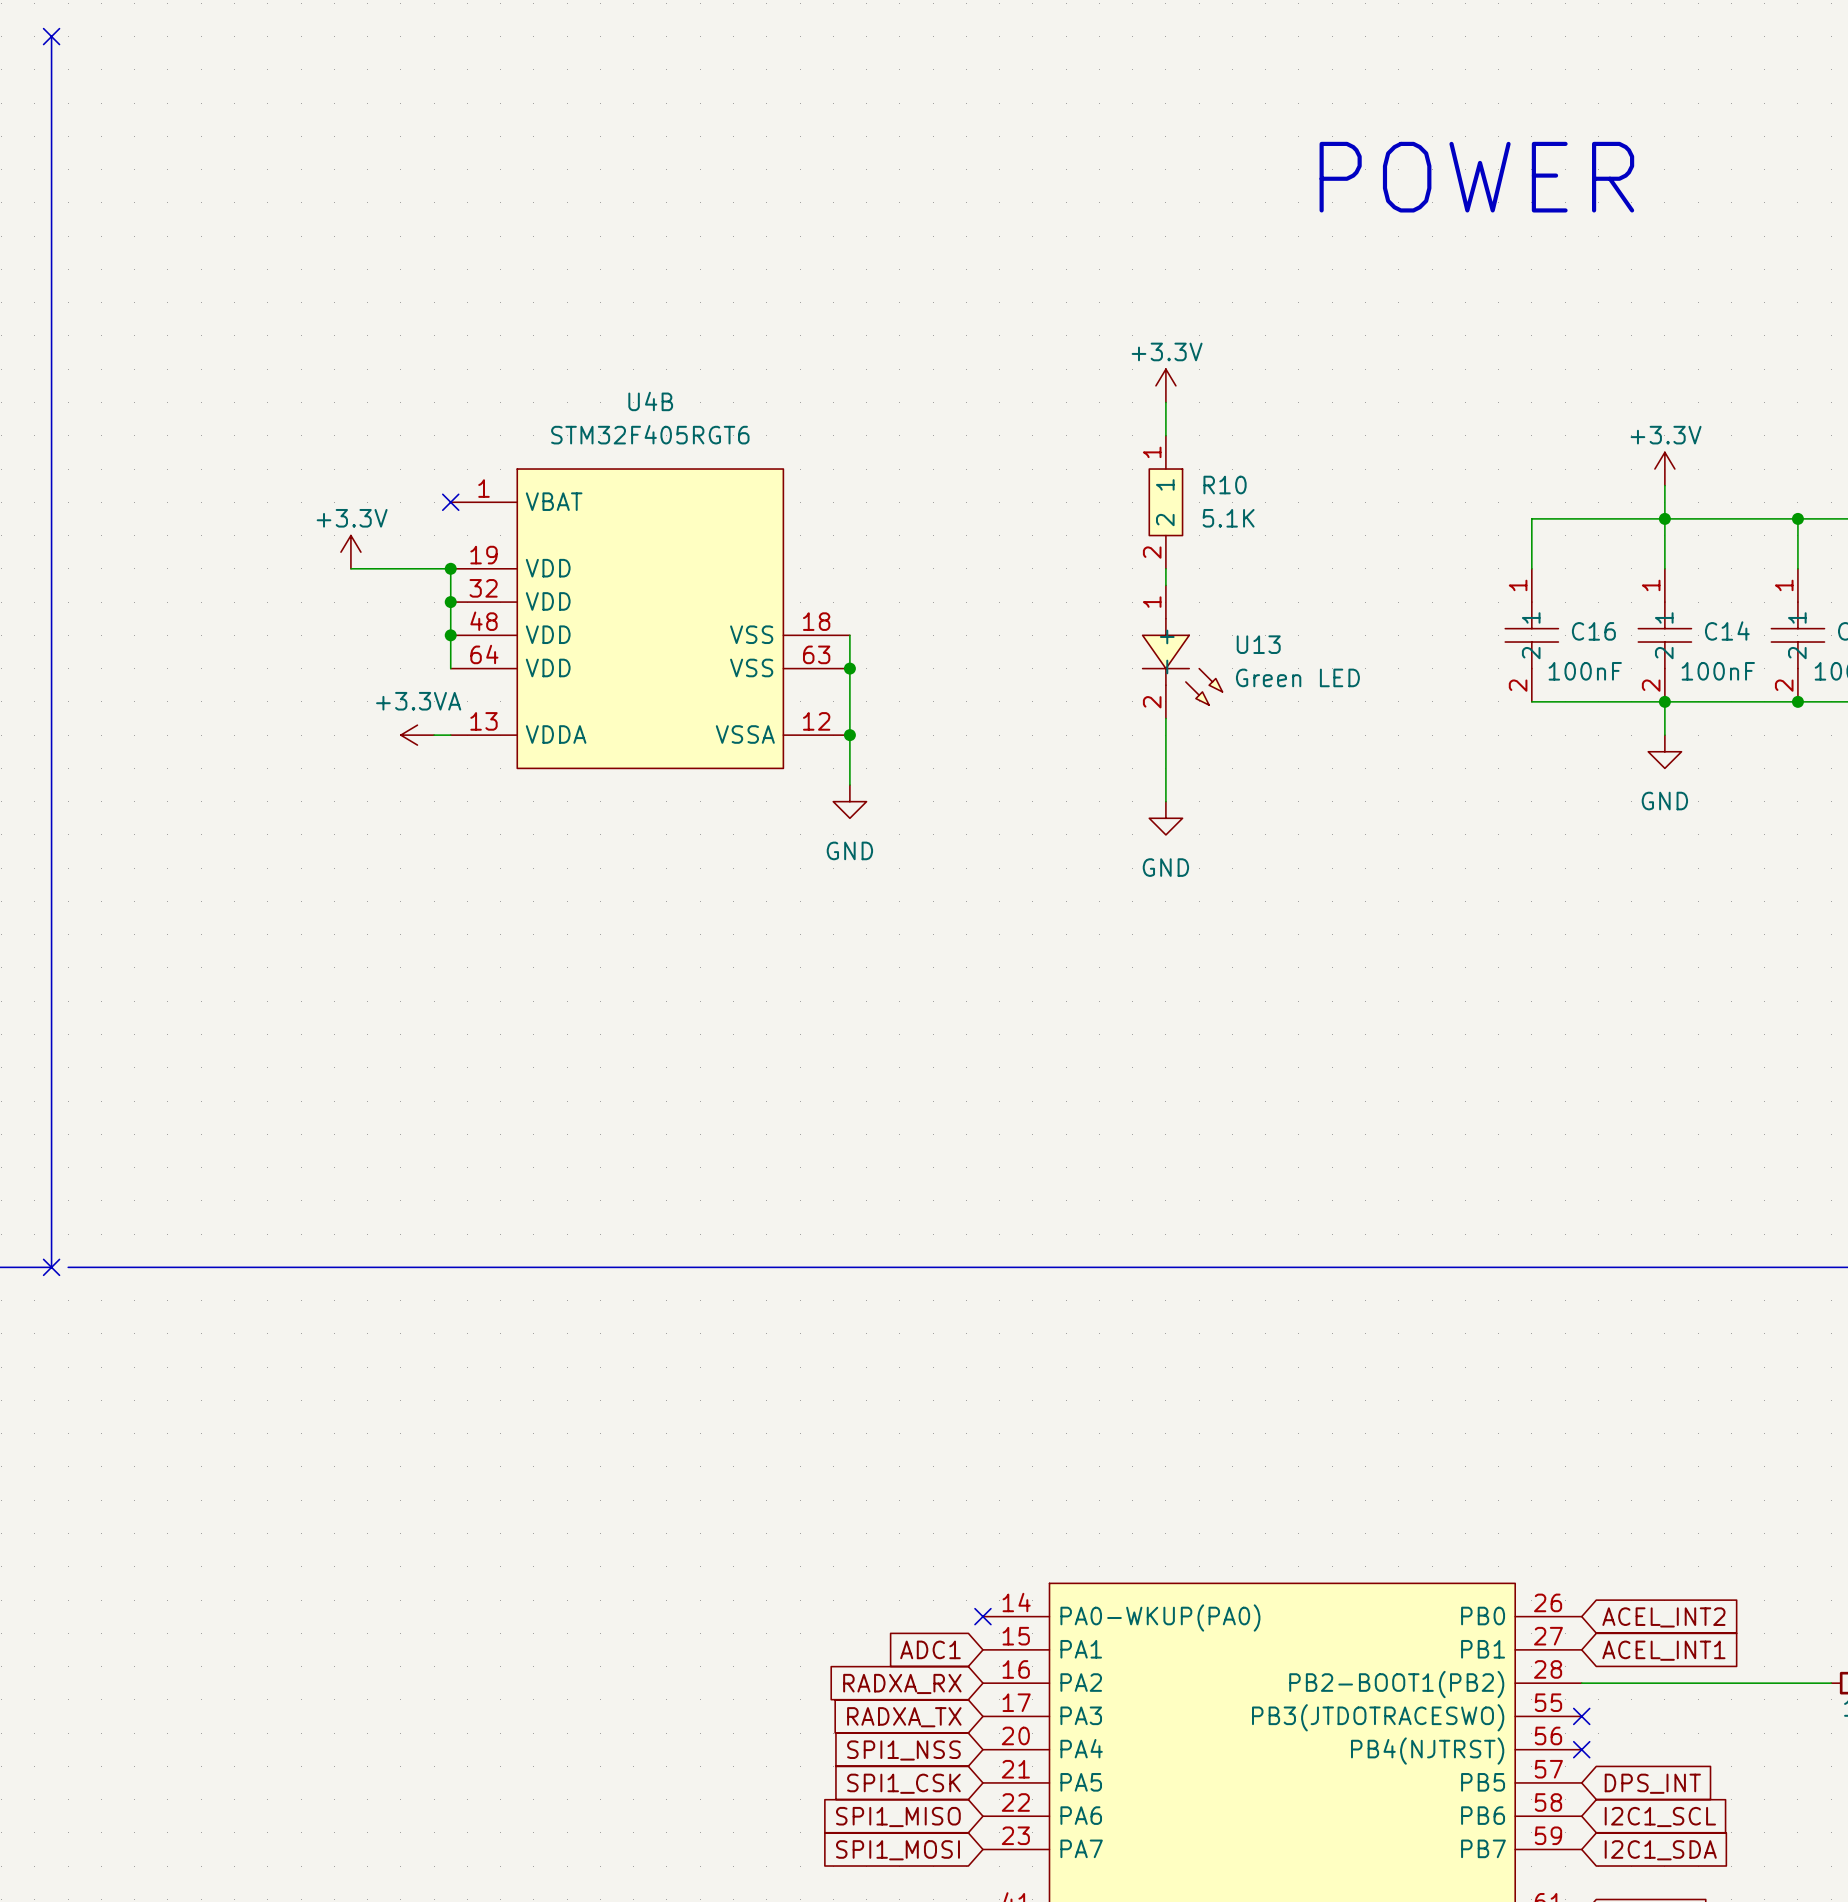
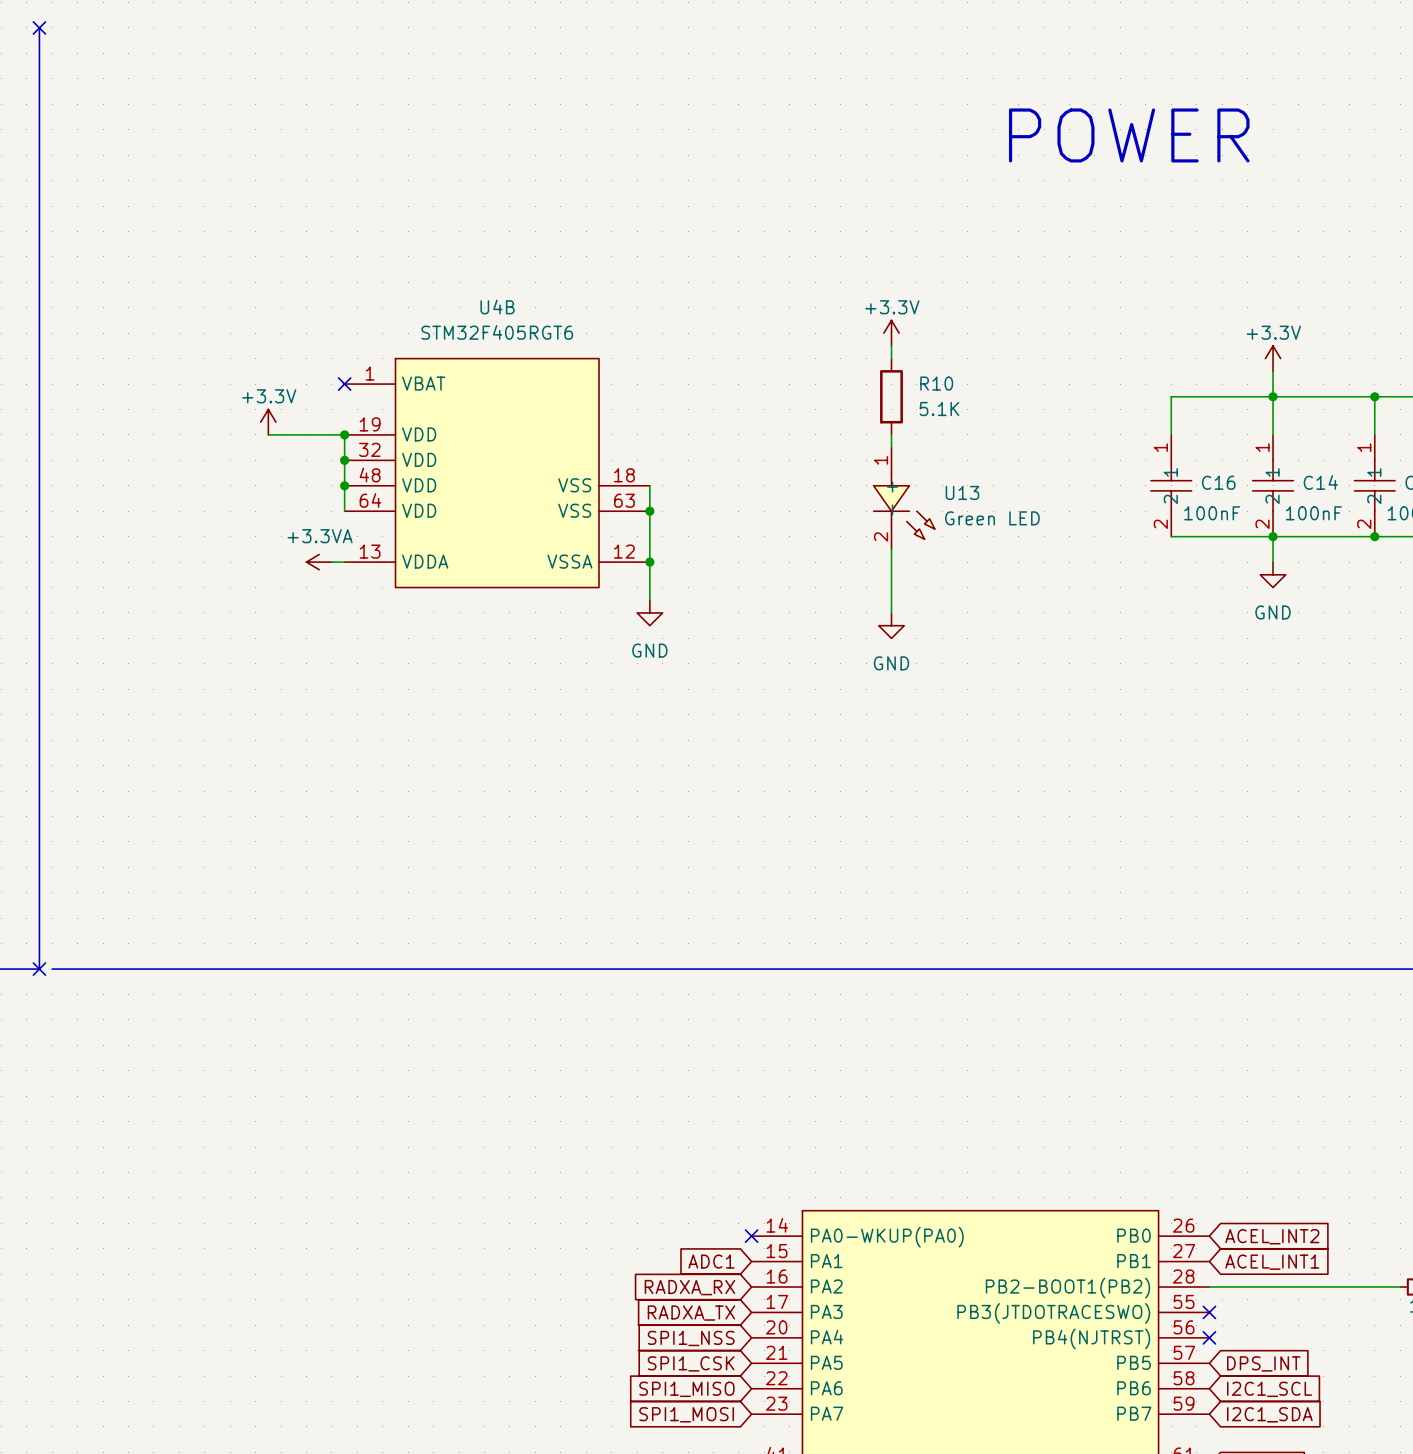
power symbol position: +3.3V (1165, 385) -> +3.3V (891, 333)
R10 symbol: [1149, 435, 1183, 569] -> [880, 358, 903, 435]

